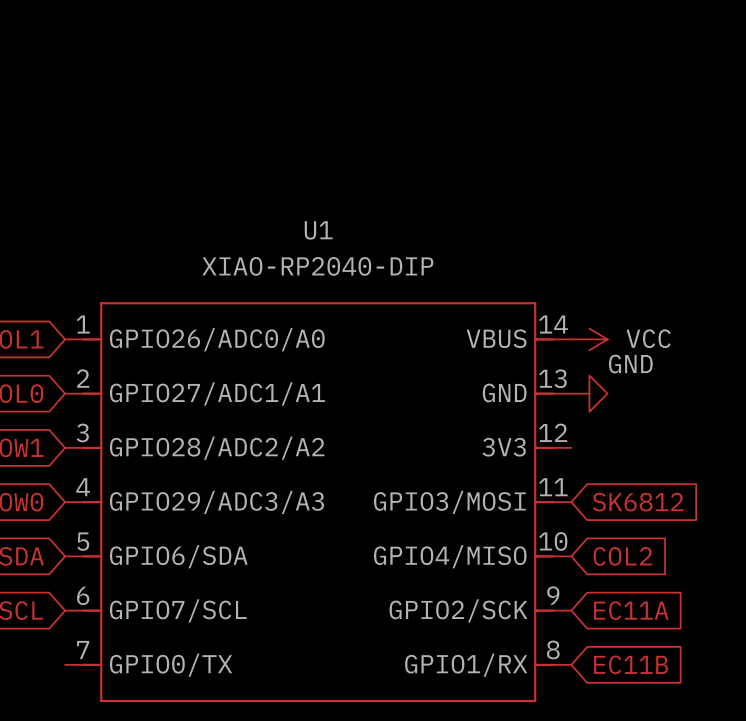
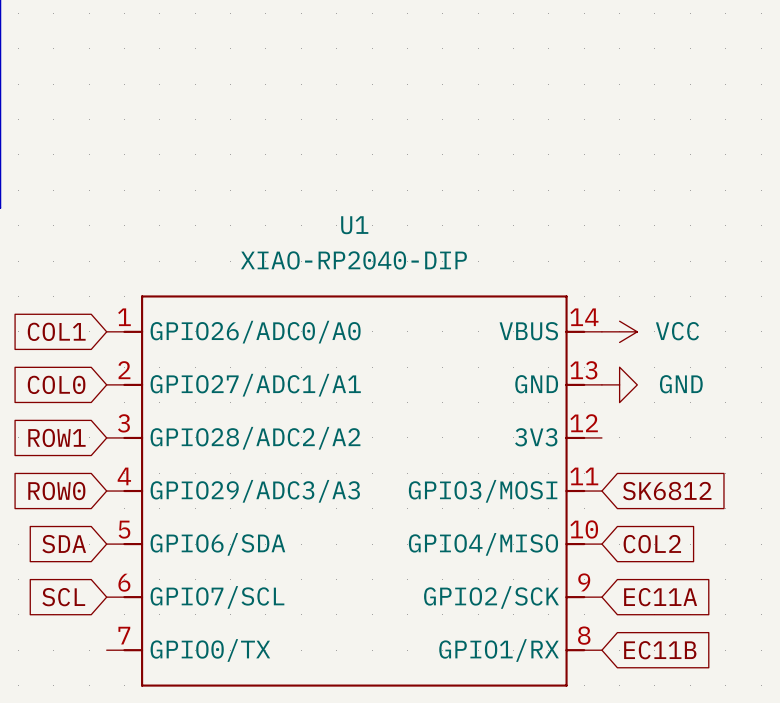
power symbol text position: GND (630, 364) -> GND (681, 384)

